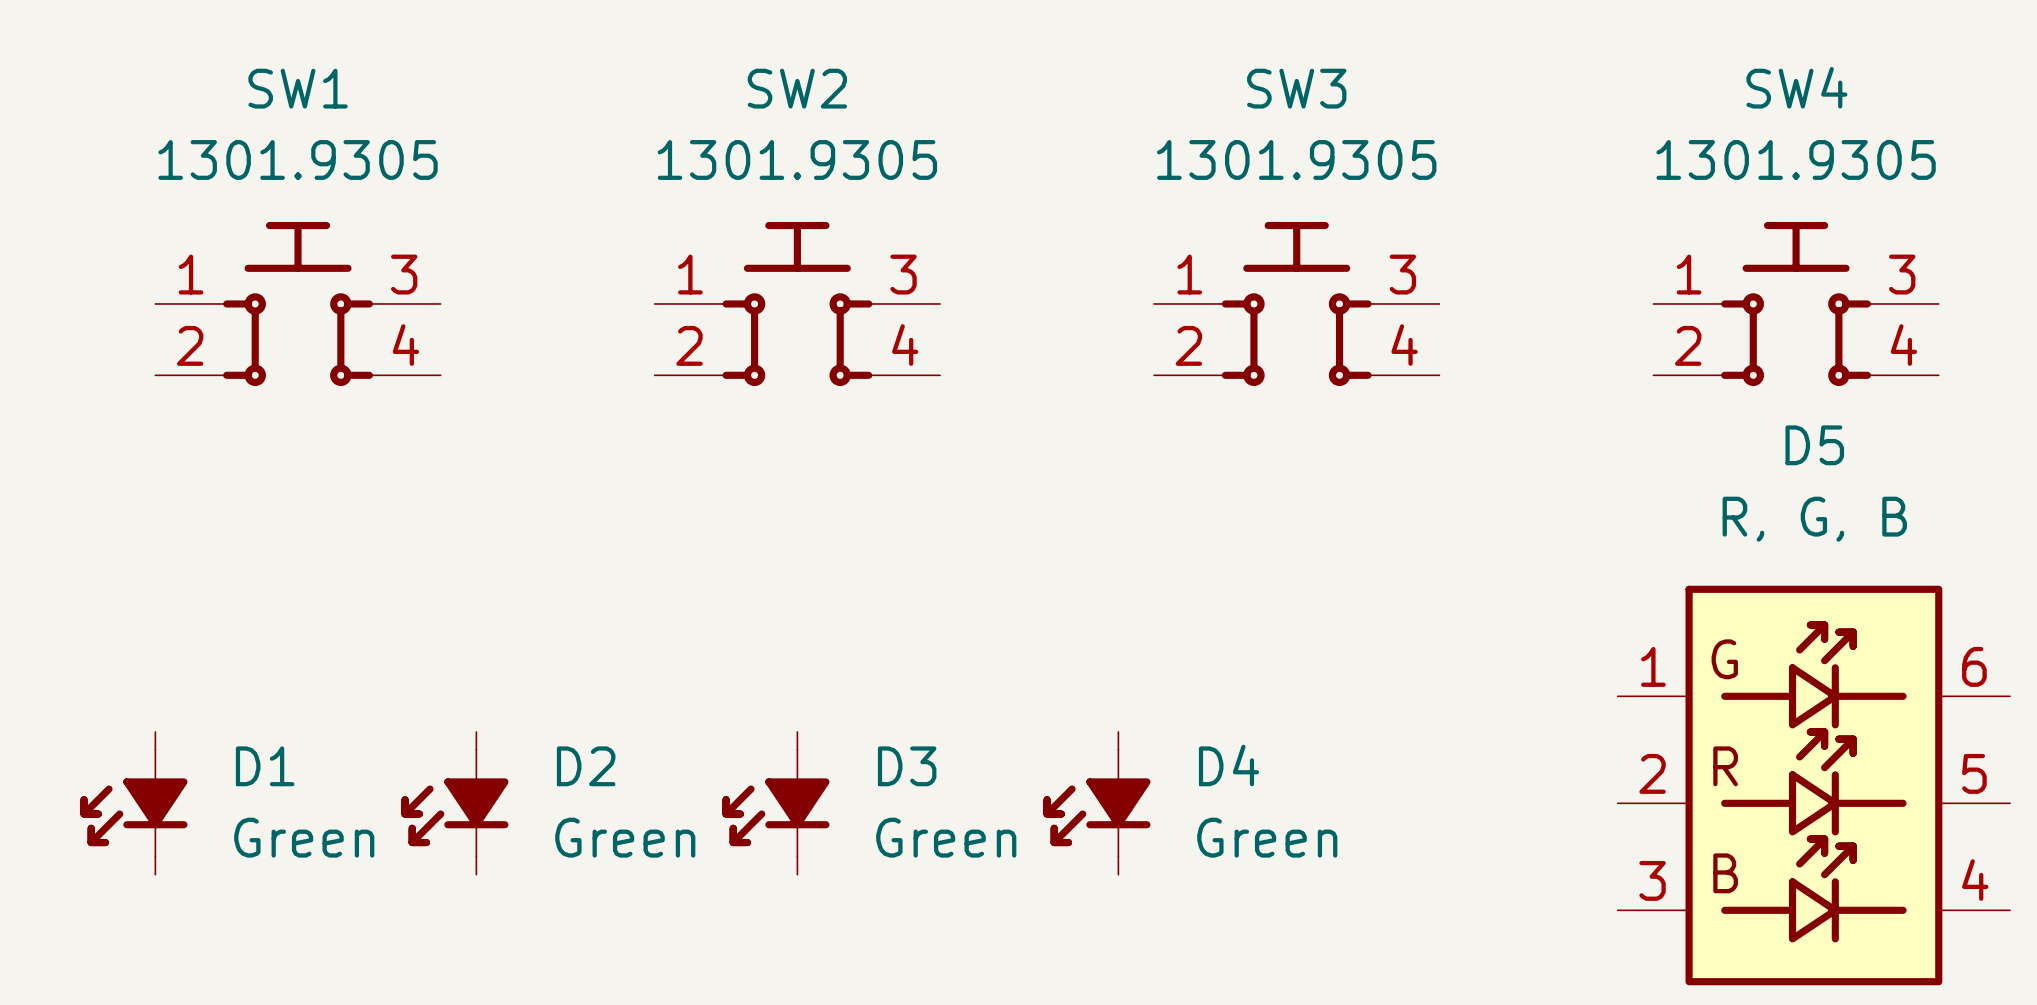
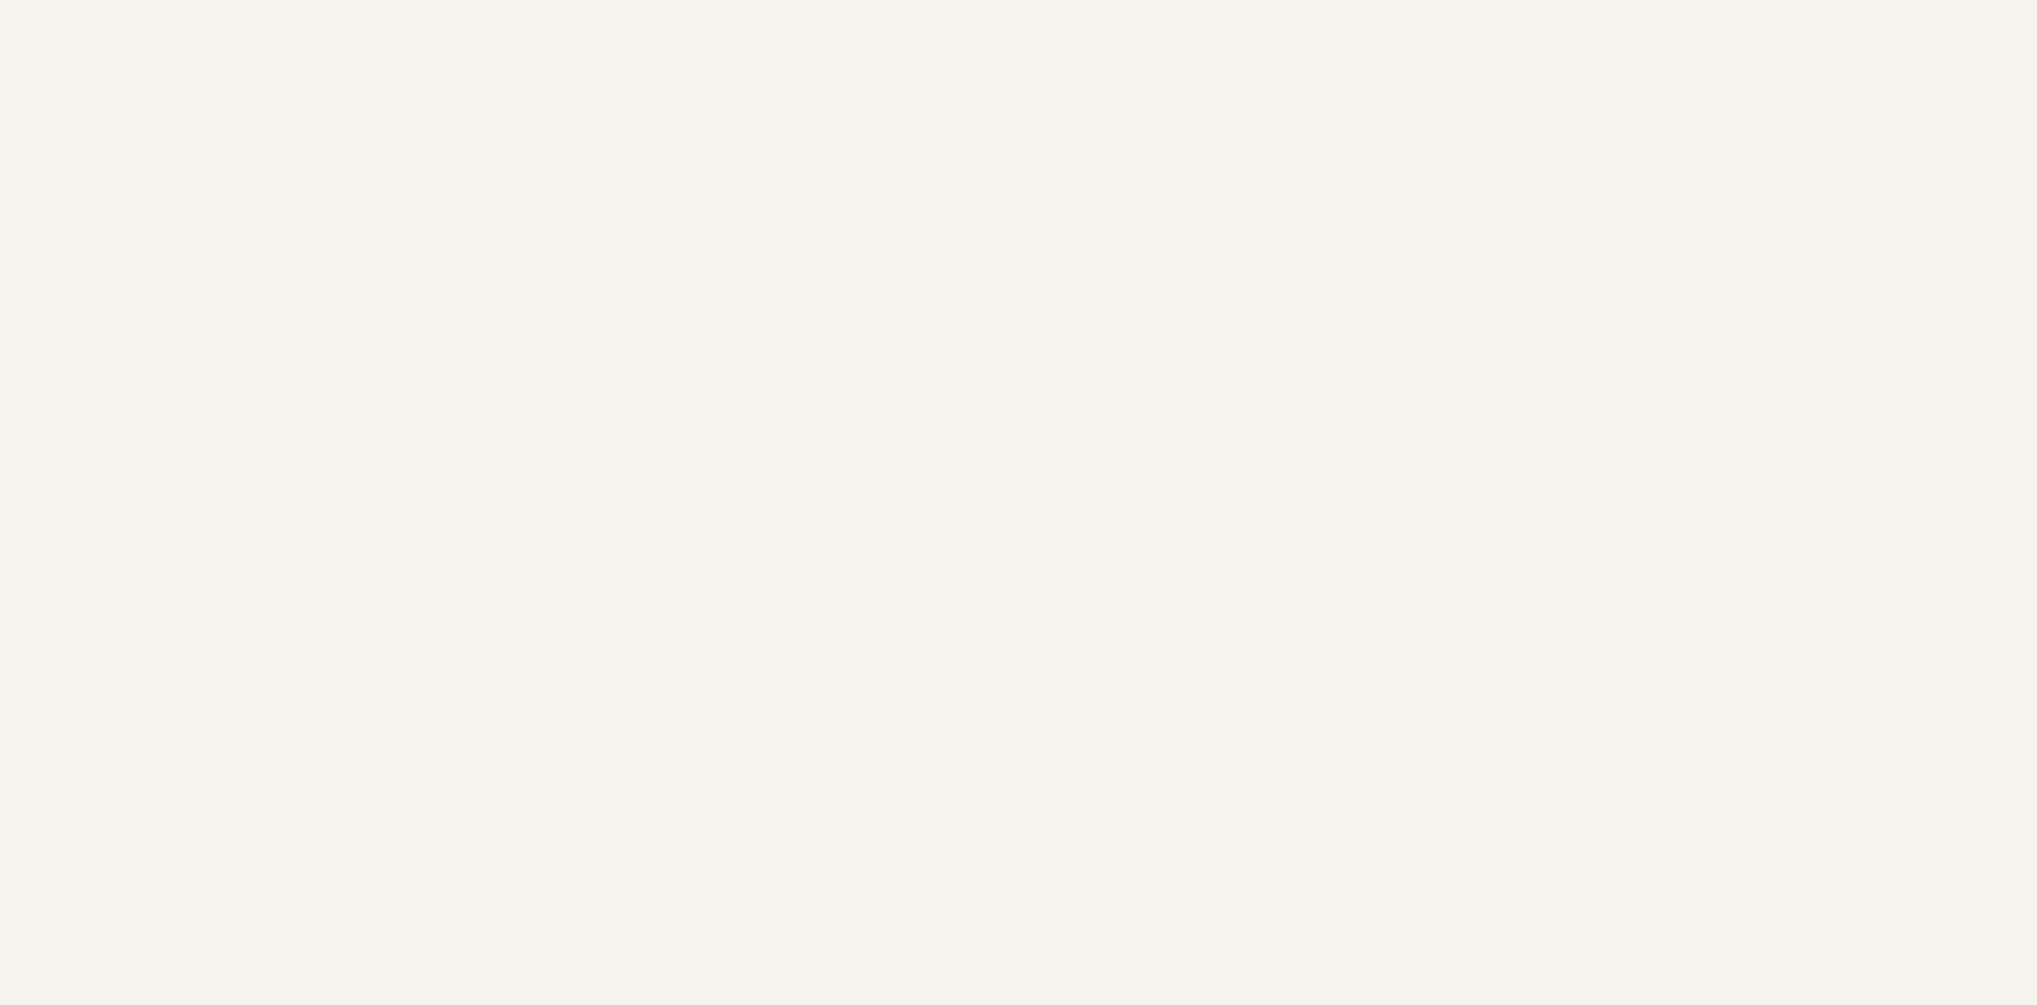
SW1: (298, 303) -> none
SW2: (797, 303) -> none
SW3: (1296, 303) -> none
SW4: (1796, 303) -> none
D5: (1813, 785) -> none
D1: (133, 803) -> none
D2: (454, 803) -> none
D3: (775, 803) -> none
D4: (1096, 803) -> none

